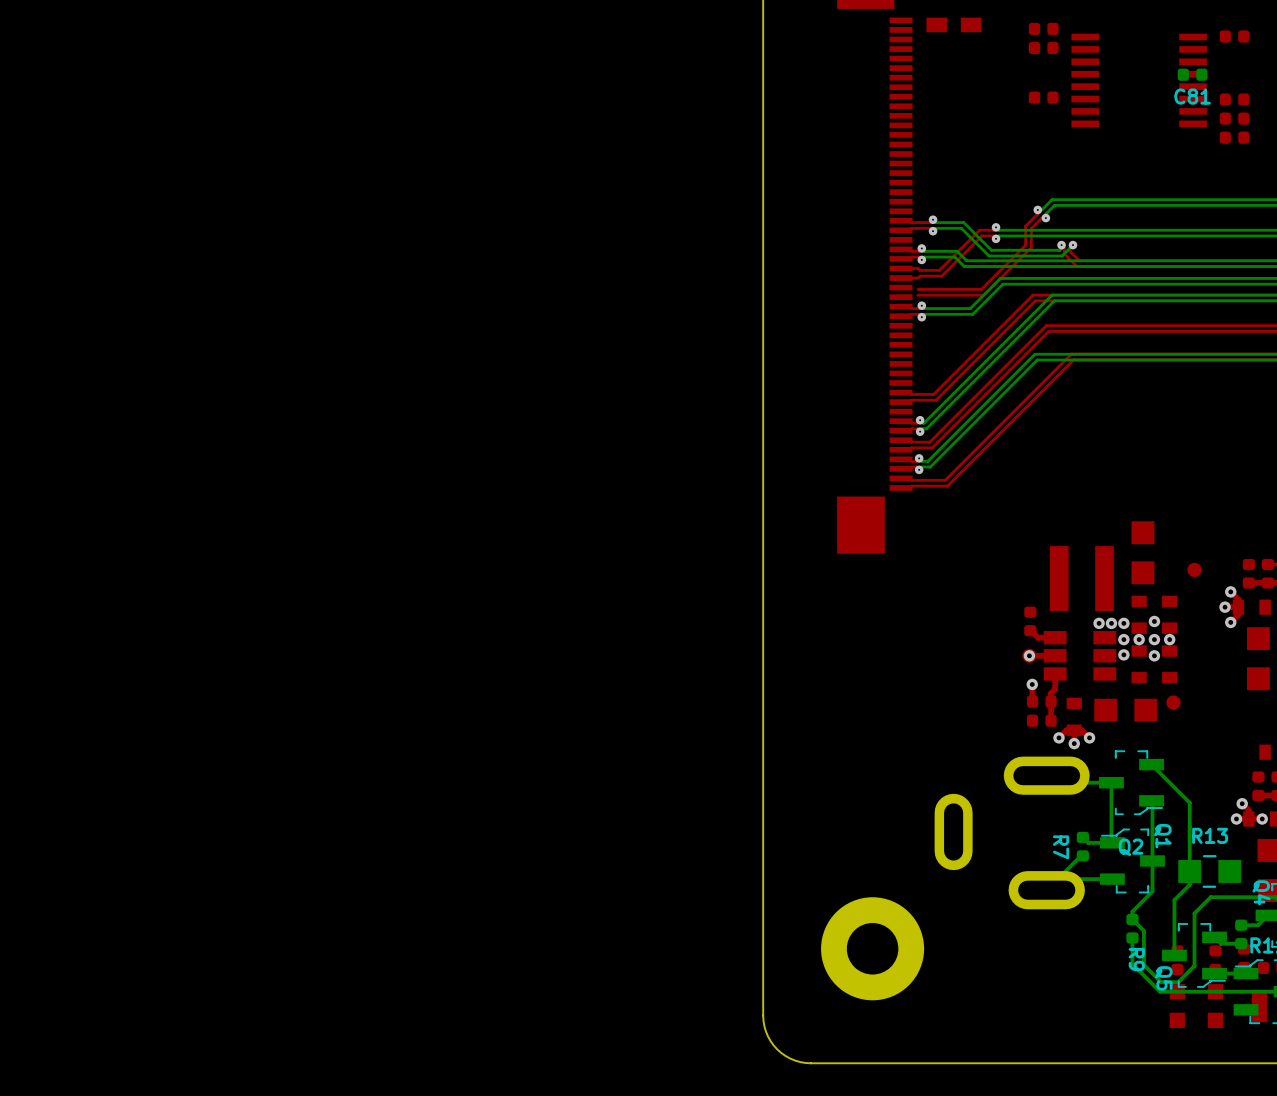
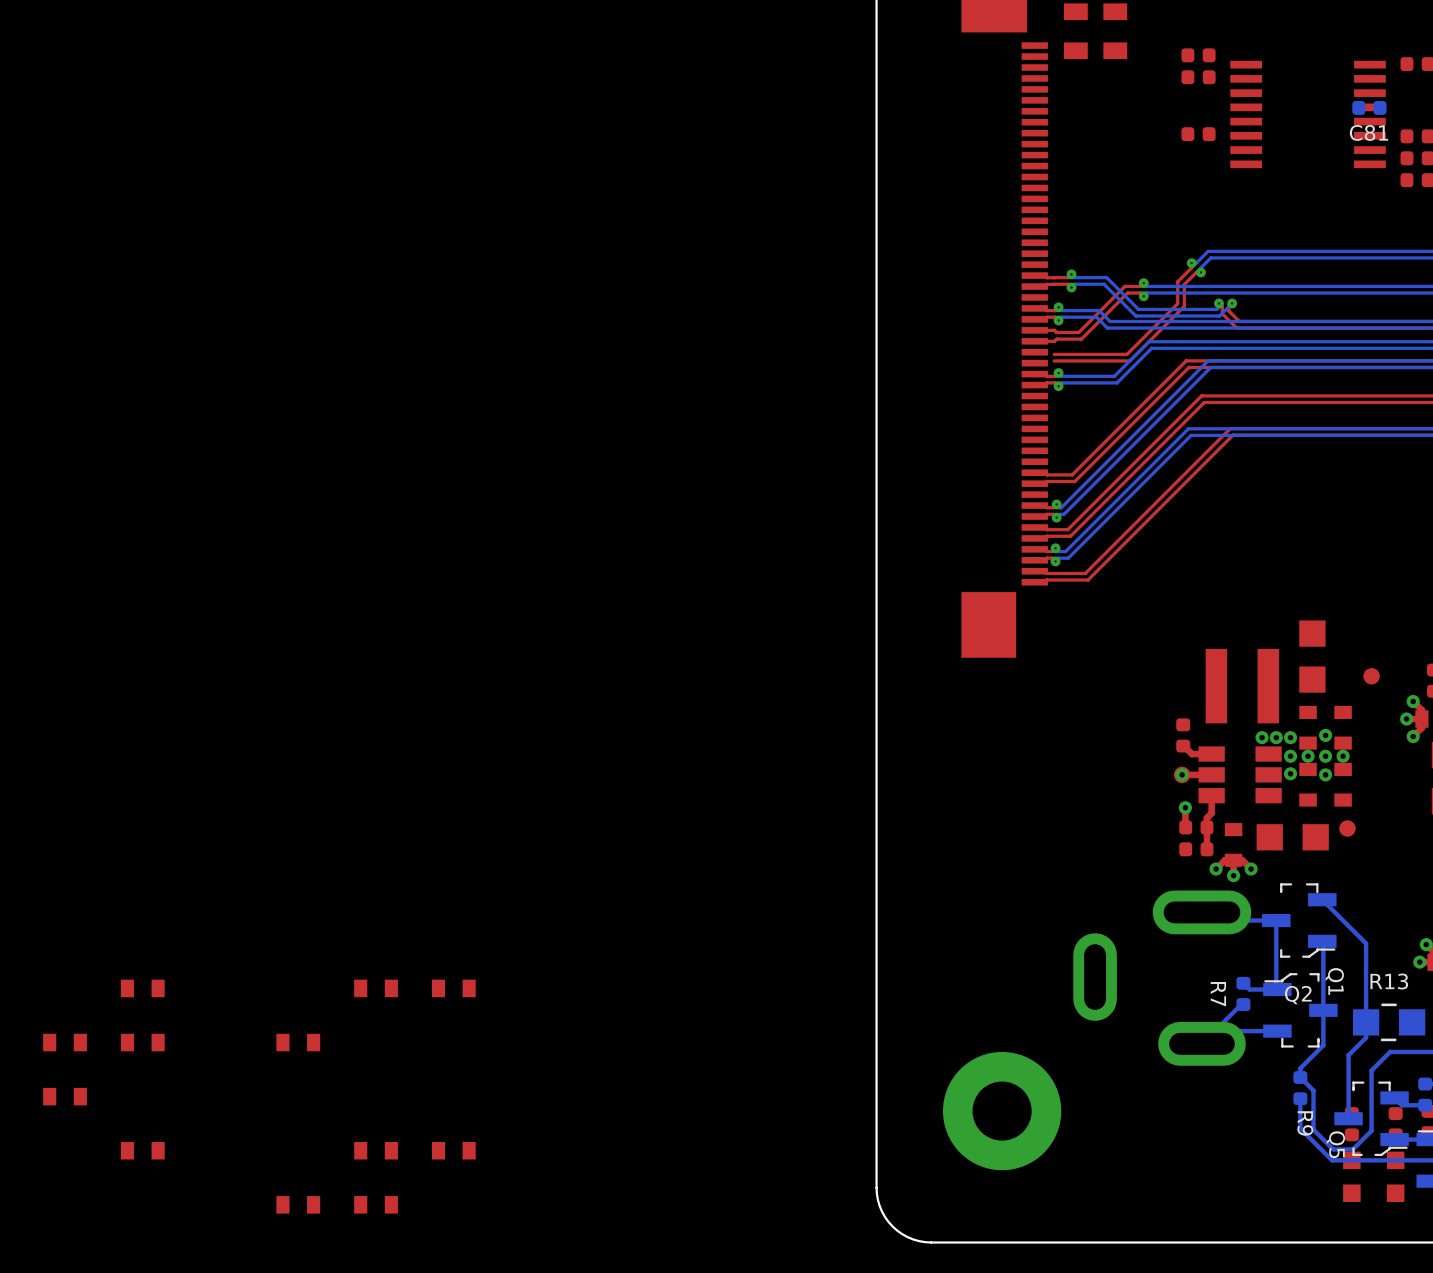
part: none -> (142, 988)
part: none -> (376, 988)
part: none -> (453, 988)
part: none -> (65, 1042)
part: none -> (142, 1042)
part: none -> (298, 1042)
part: none -> (65, 1096)
part: none -> (142, 1150)
part: none -> (376, 1150)
part: none -> (453, 1150)
part: none -> (298, 1204)
part: none -> (376, 1204)

